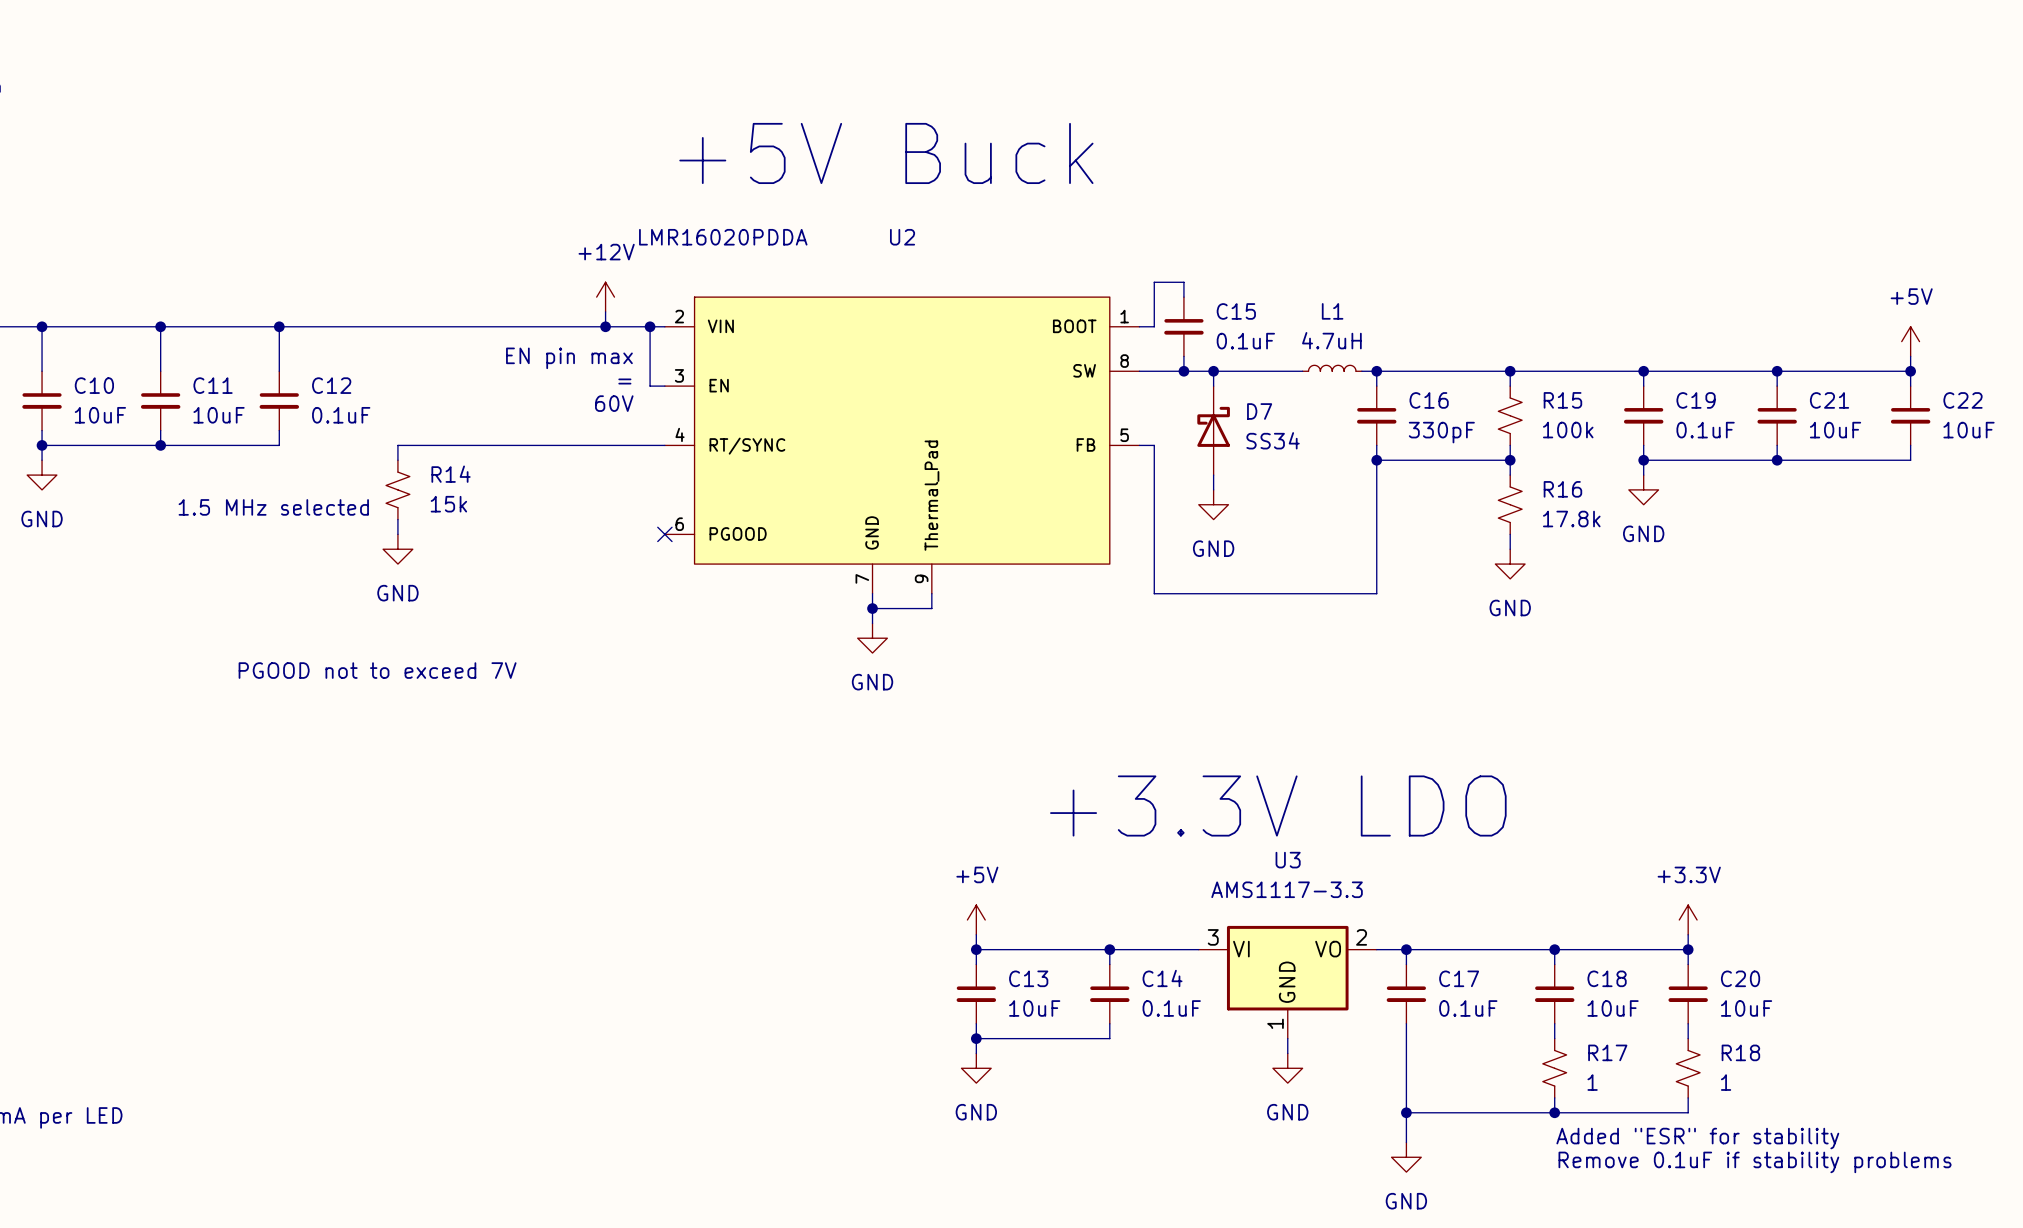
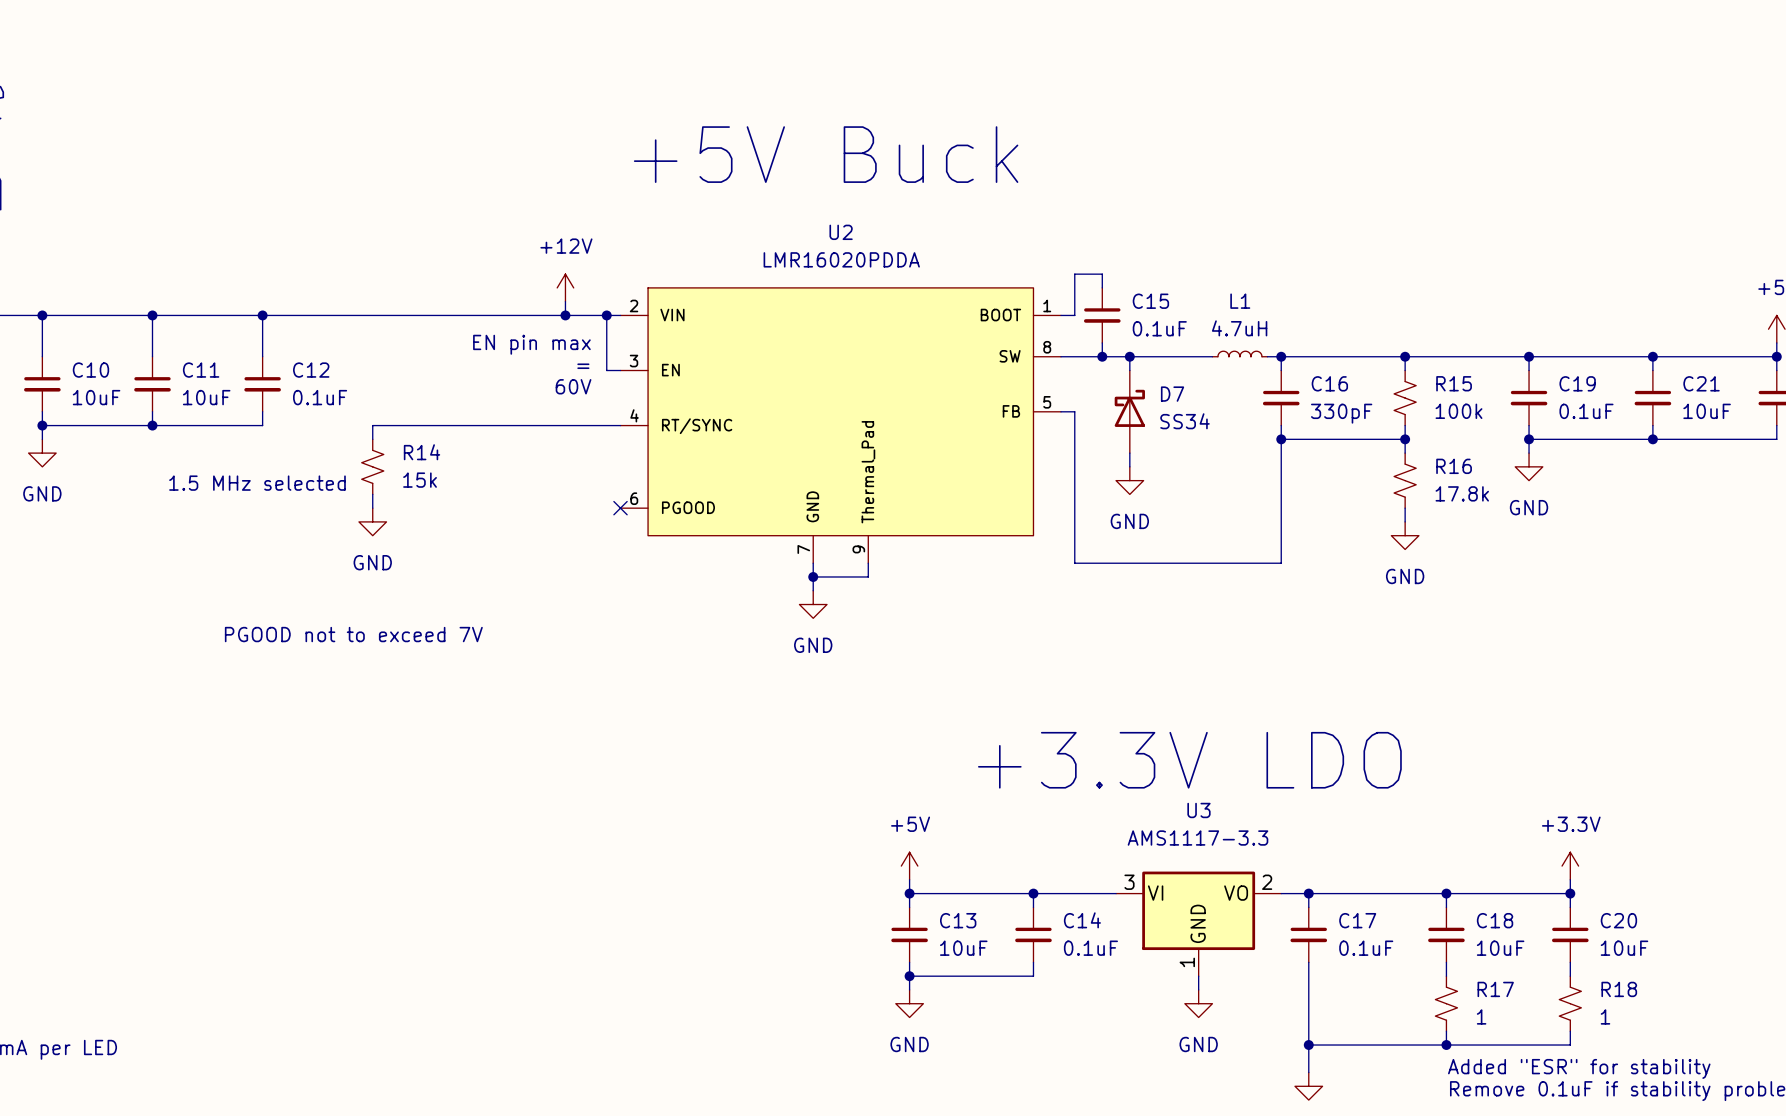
U2 value position: LMR16020PDDA (723, 237) -> LMR16020PDDA (841, 259)
U2 symbol: [664, 297, 1140, 594] -> [620, 287, 1062, 564]
wire: (1139, 445) (1154, 445) -> (1061, 411) (1074, 411) (1074, 425)

